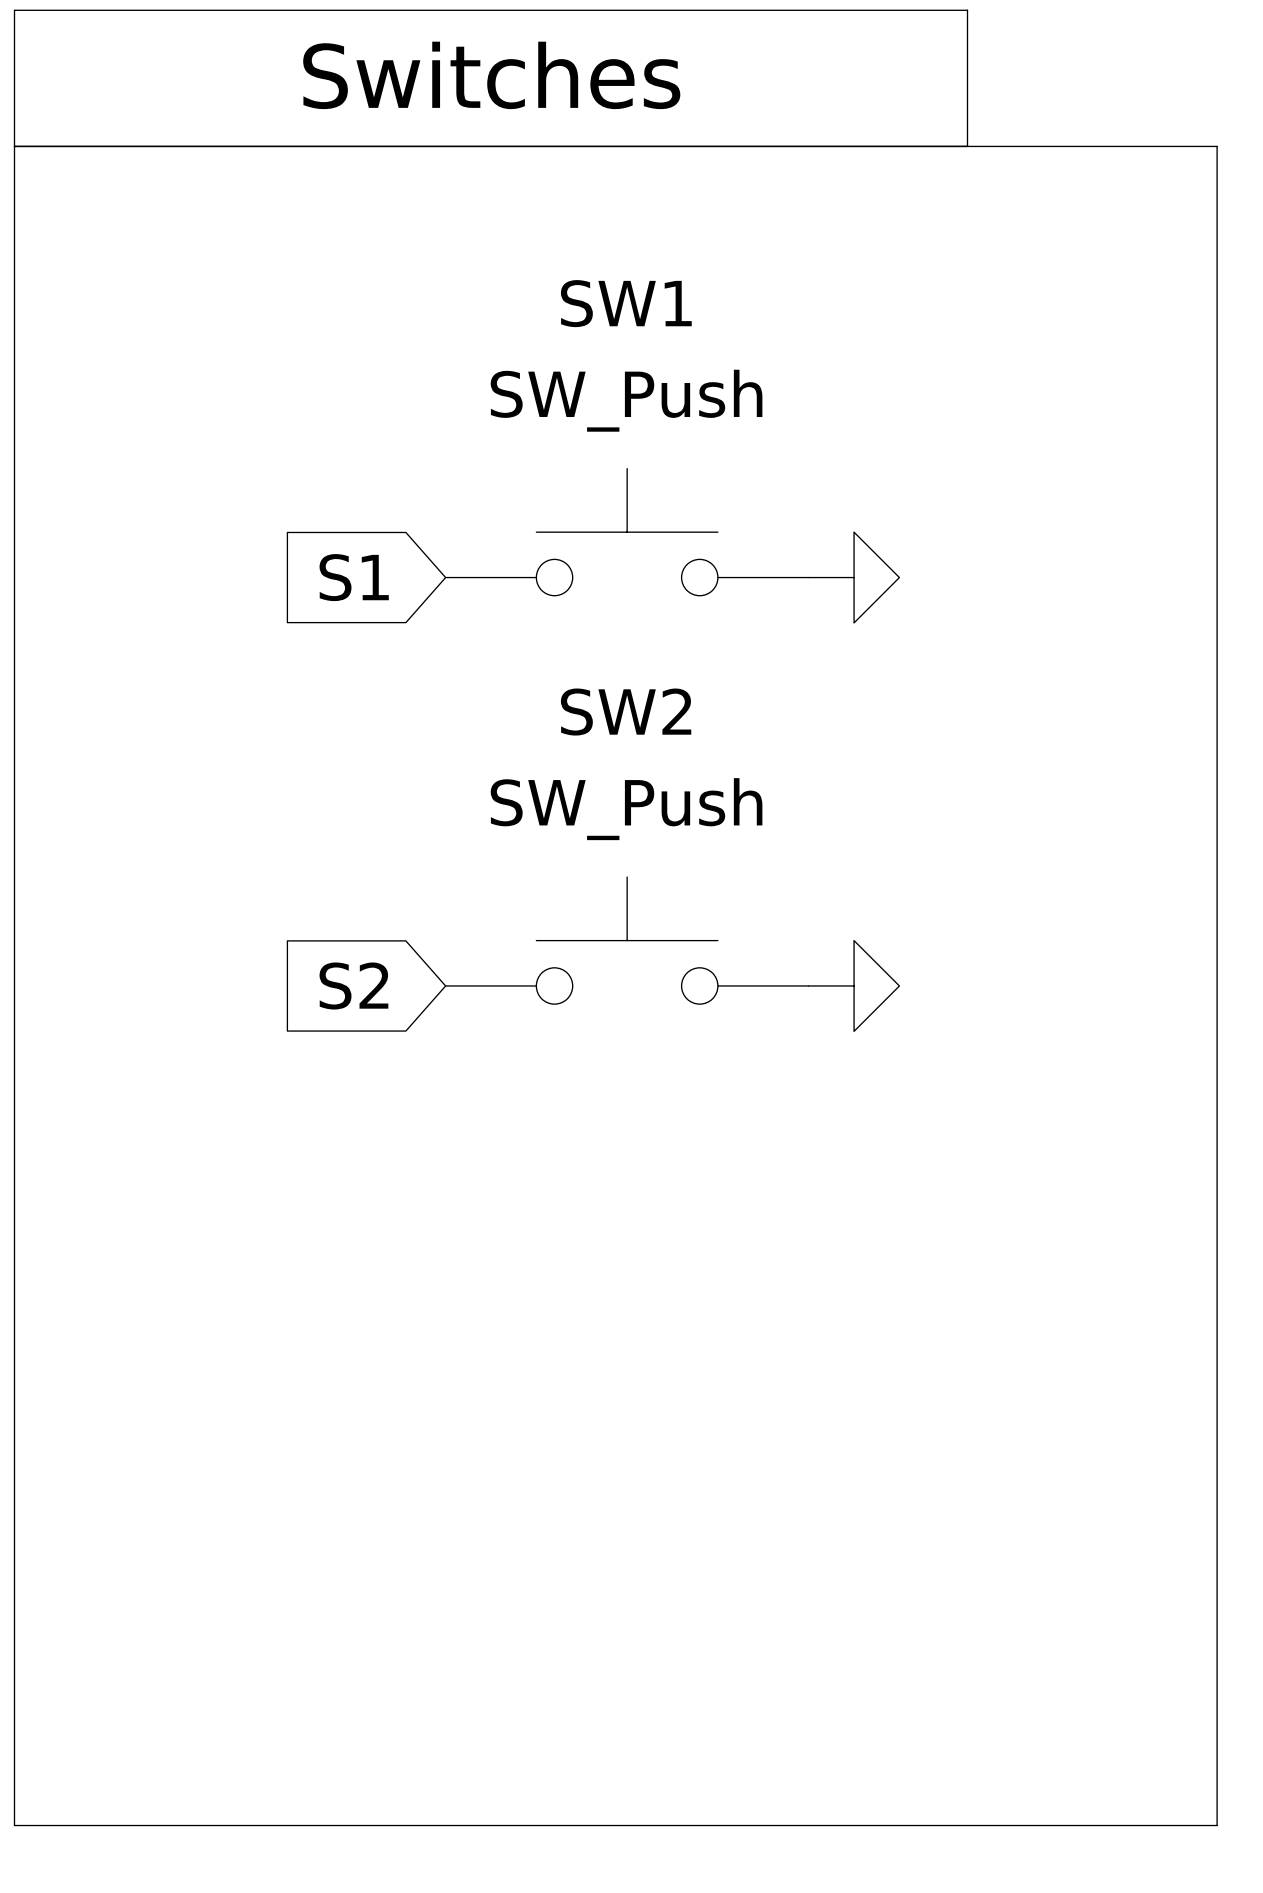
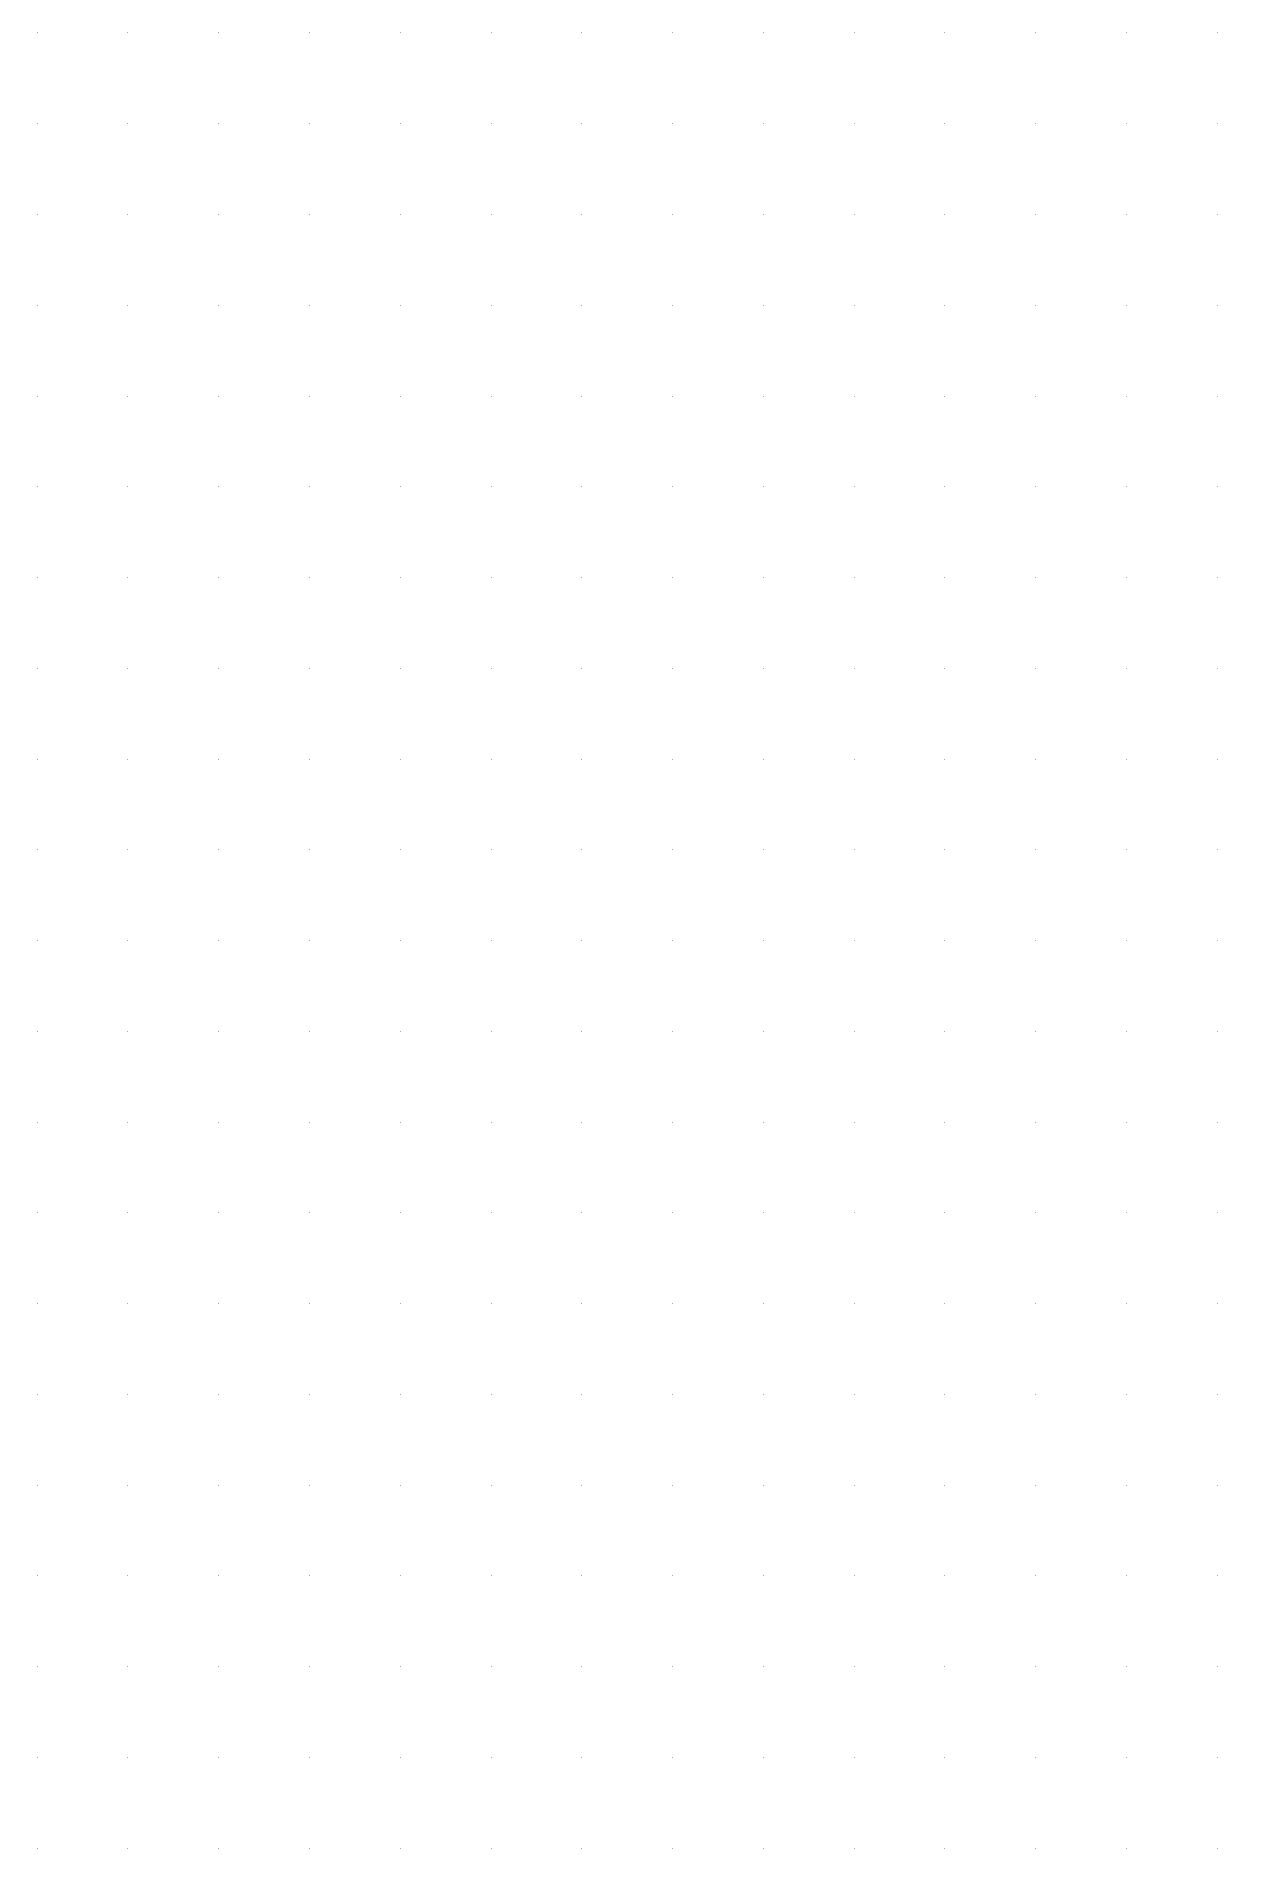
text: Switches (491, 75) -> none
line: (14, 146) (1217, 146) (1217, 1825) (14, 1825) (14, 10) (967, 10) (967, 146) -> none
SW1: SW_Push (627, 532) -> none
global label: S1 (354, 577) -> none
power symbol: (854, 577) -> none
SW2: SW_Push (627, 940) -> none
power symbol: (854, 985) -> none
global label: S2 (353, 986) -> none

